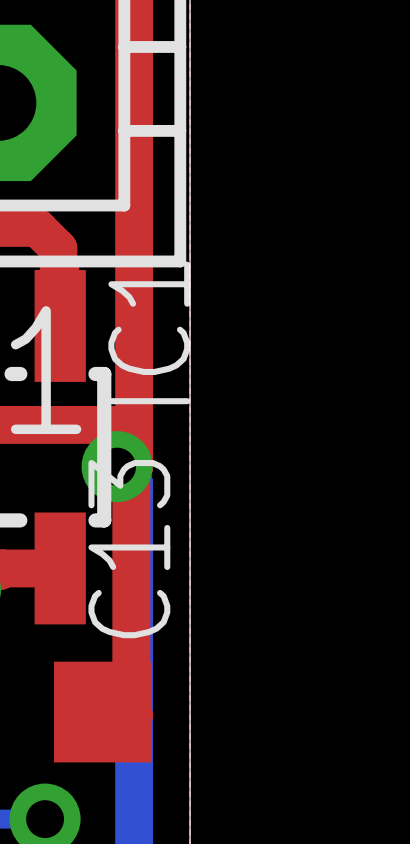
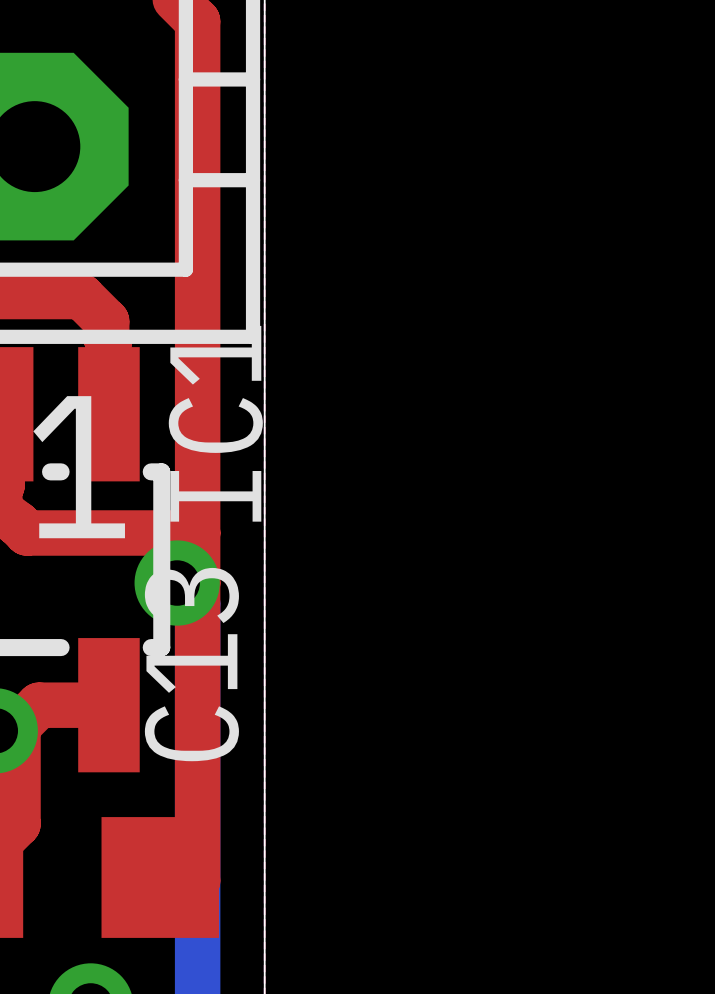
top track: (117, 466) (131, 480) (131, 712) -> none
top track: none -> (197, 583) (197, 880)

